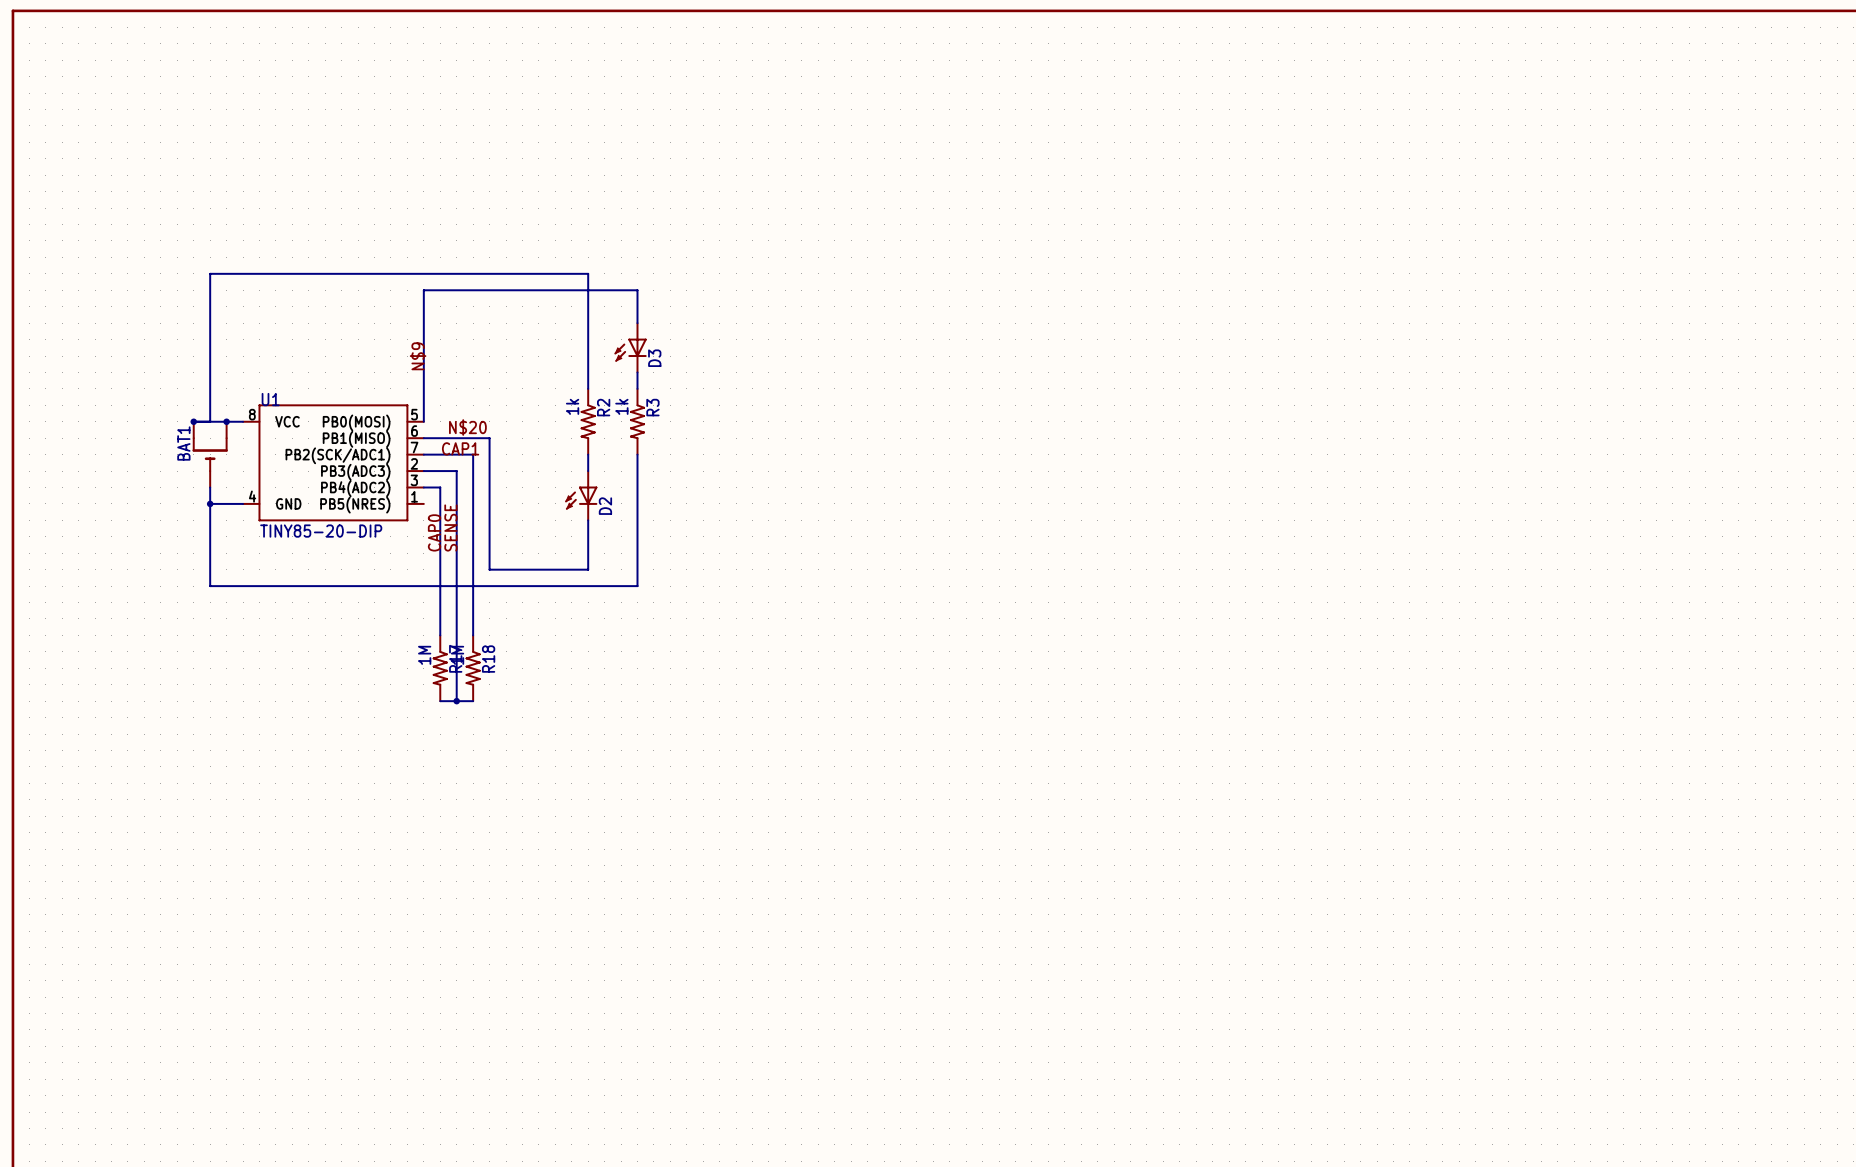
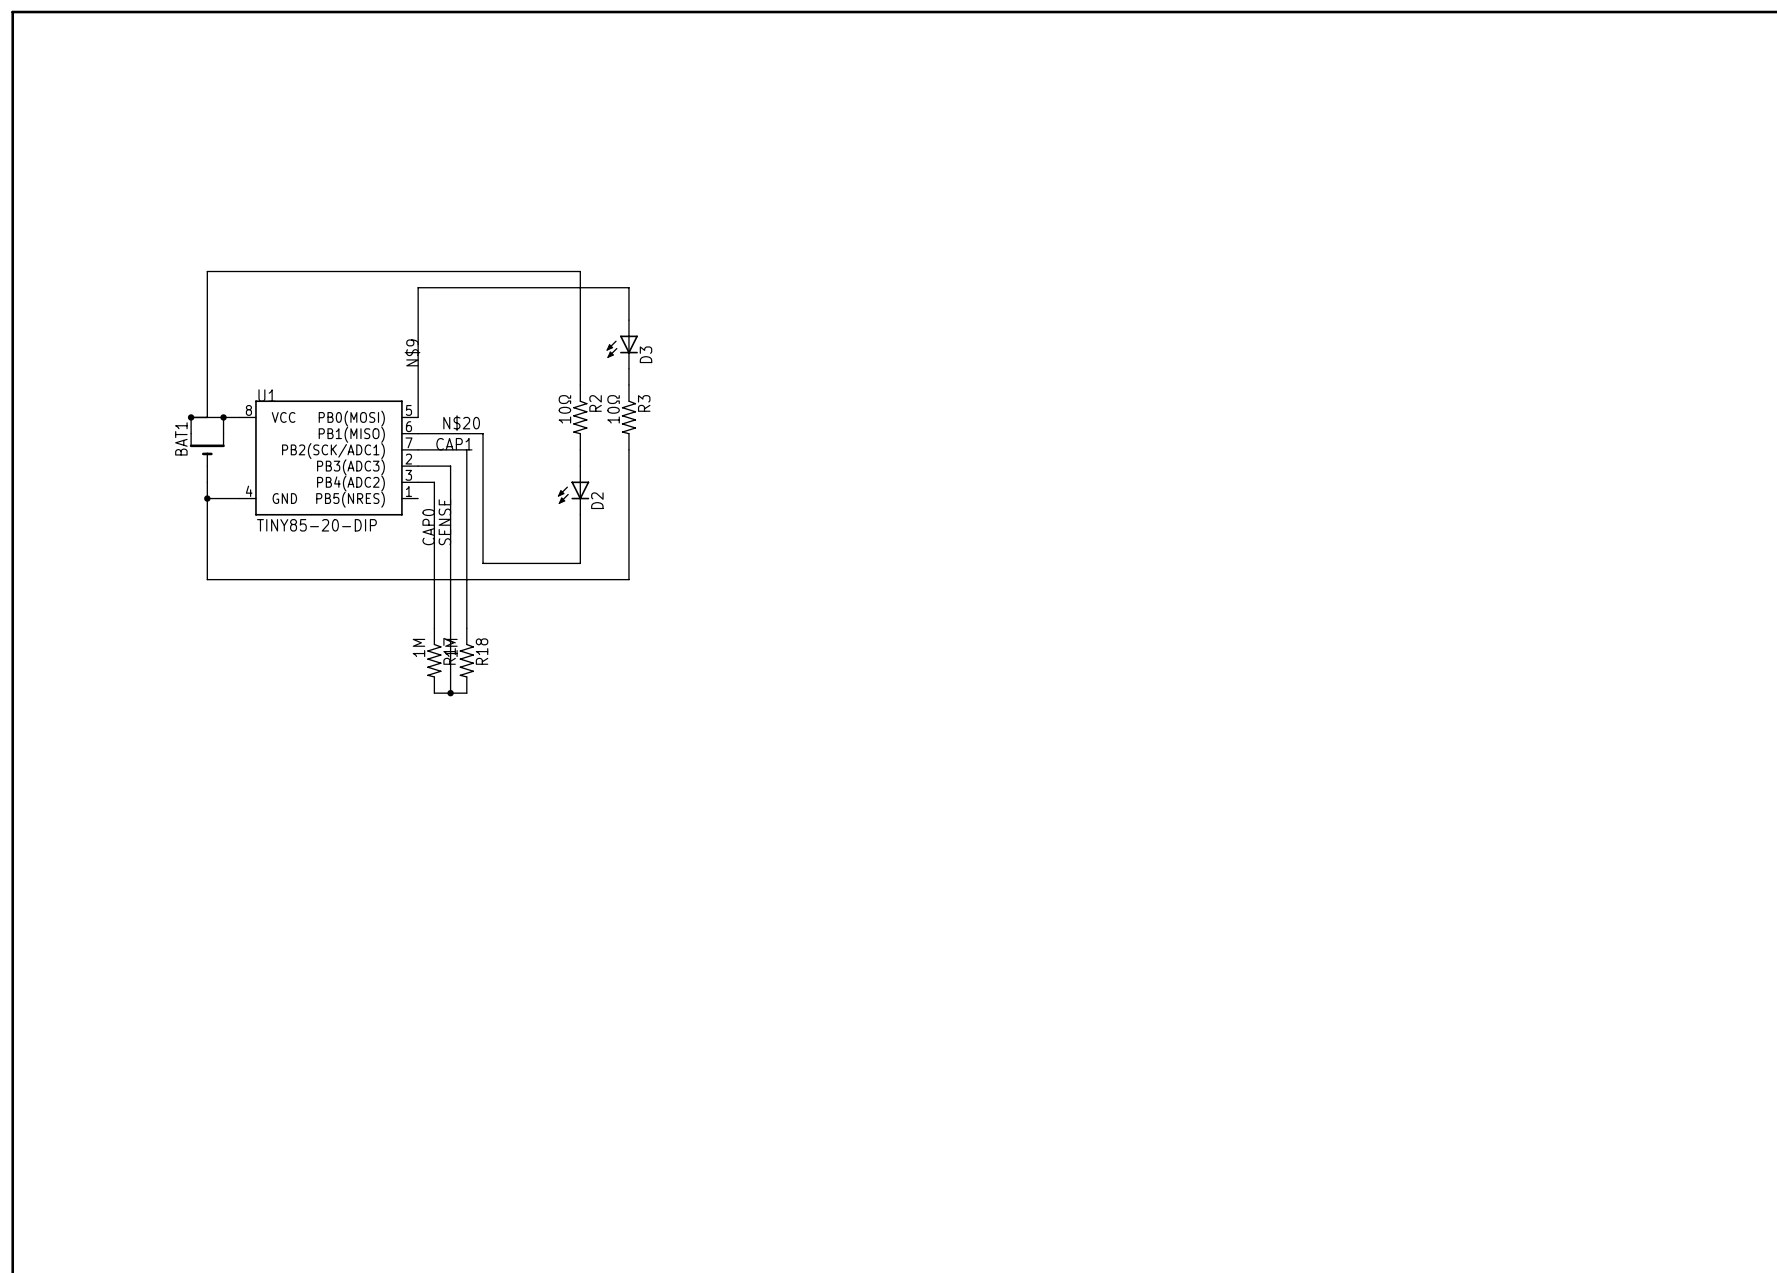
R2 value: 1k (572, 406) -> 10Ω (564, 409)
R3 value: 1k (621, 406) -> 10Ω (613, 409)

